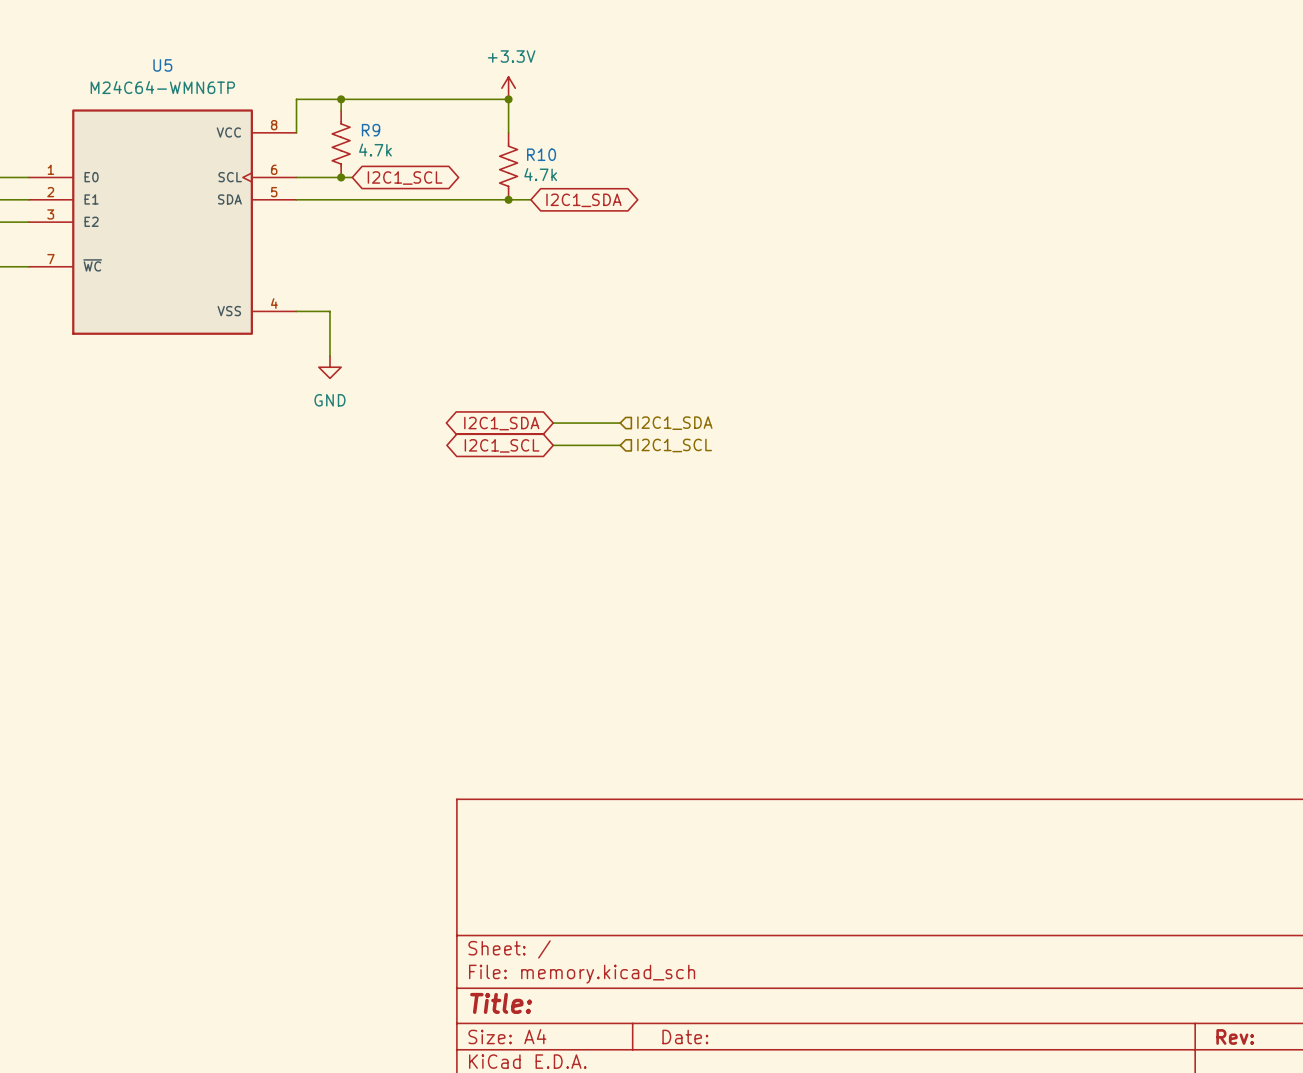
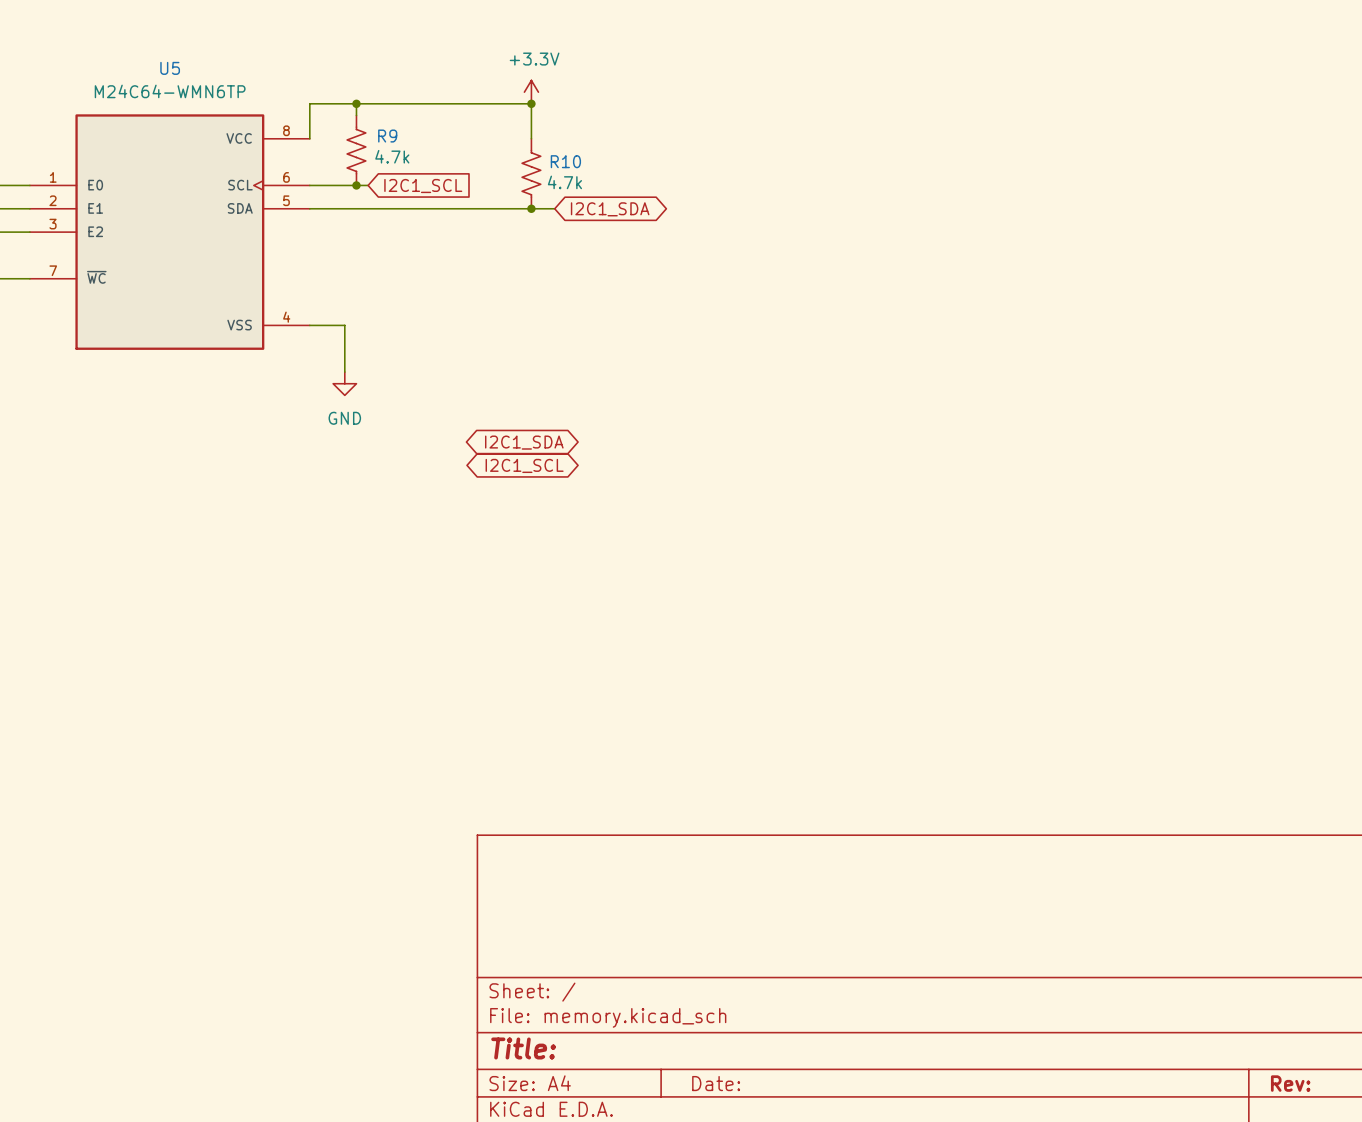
global label shape: bidirectional (405, 178) -> input (423, 186)
wire: (553, 423) (620, 423) -> none
hierarchical label: I2C1_SDA (674, 423) -> none
wire: (553, 445) (620, 445) -> none
hierarchical label: I2C1_SCL (674, 445) -> none

